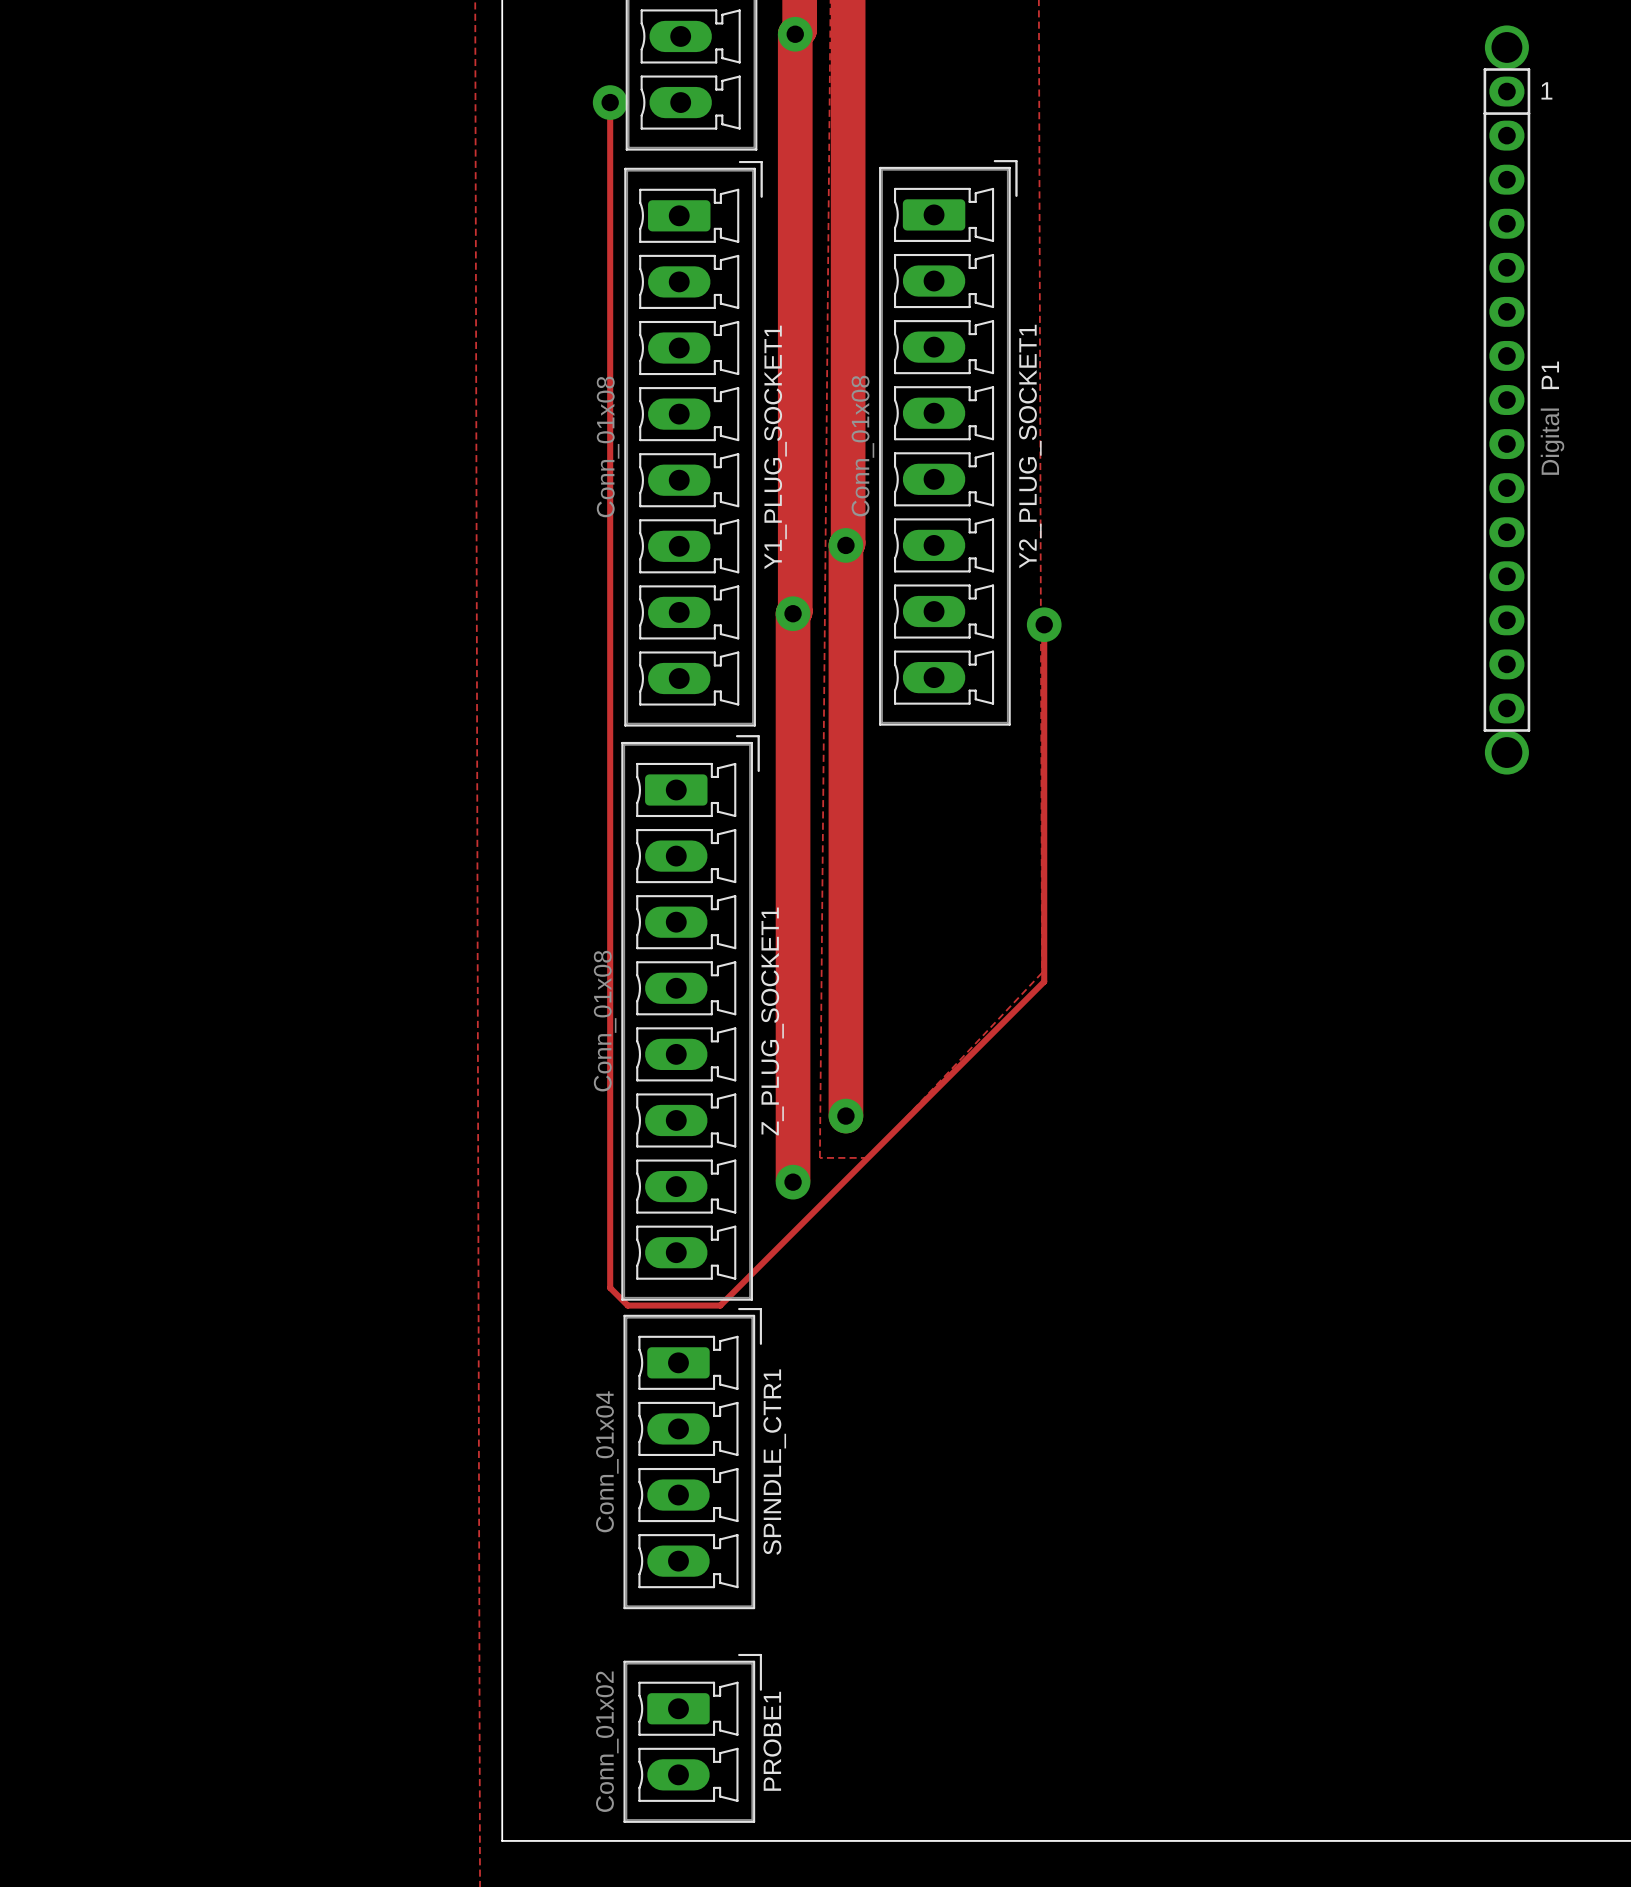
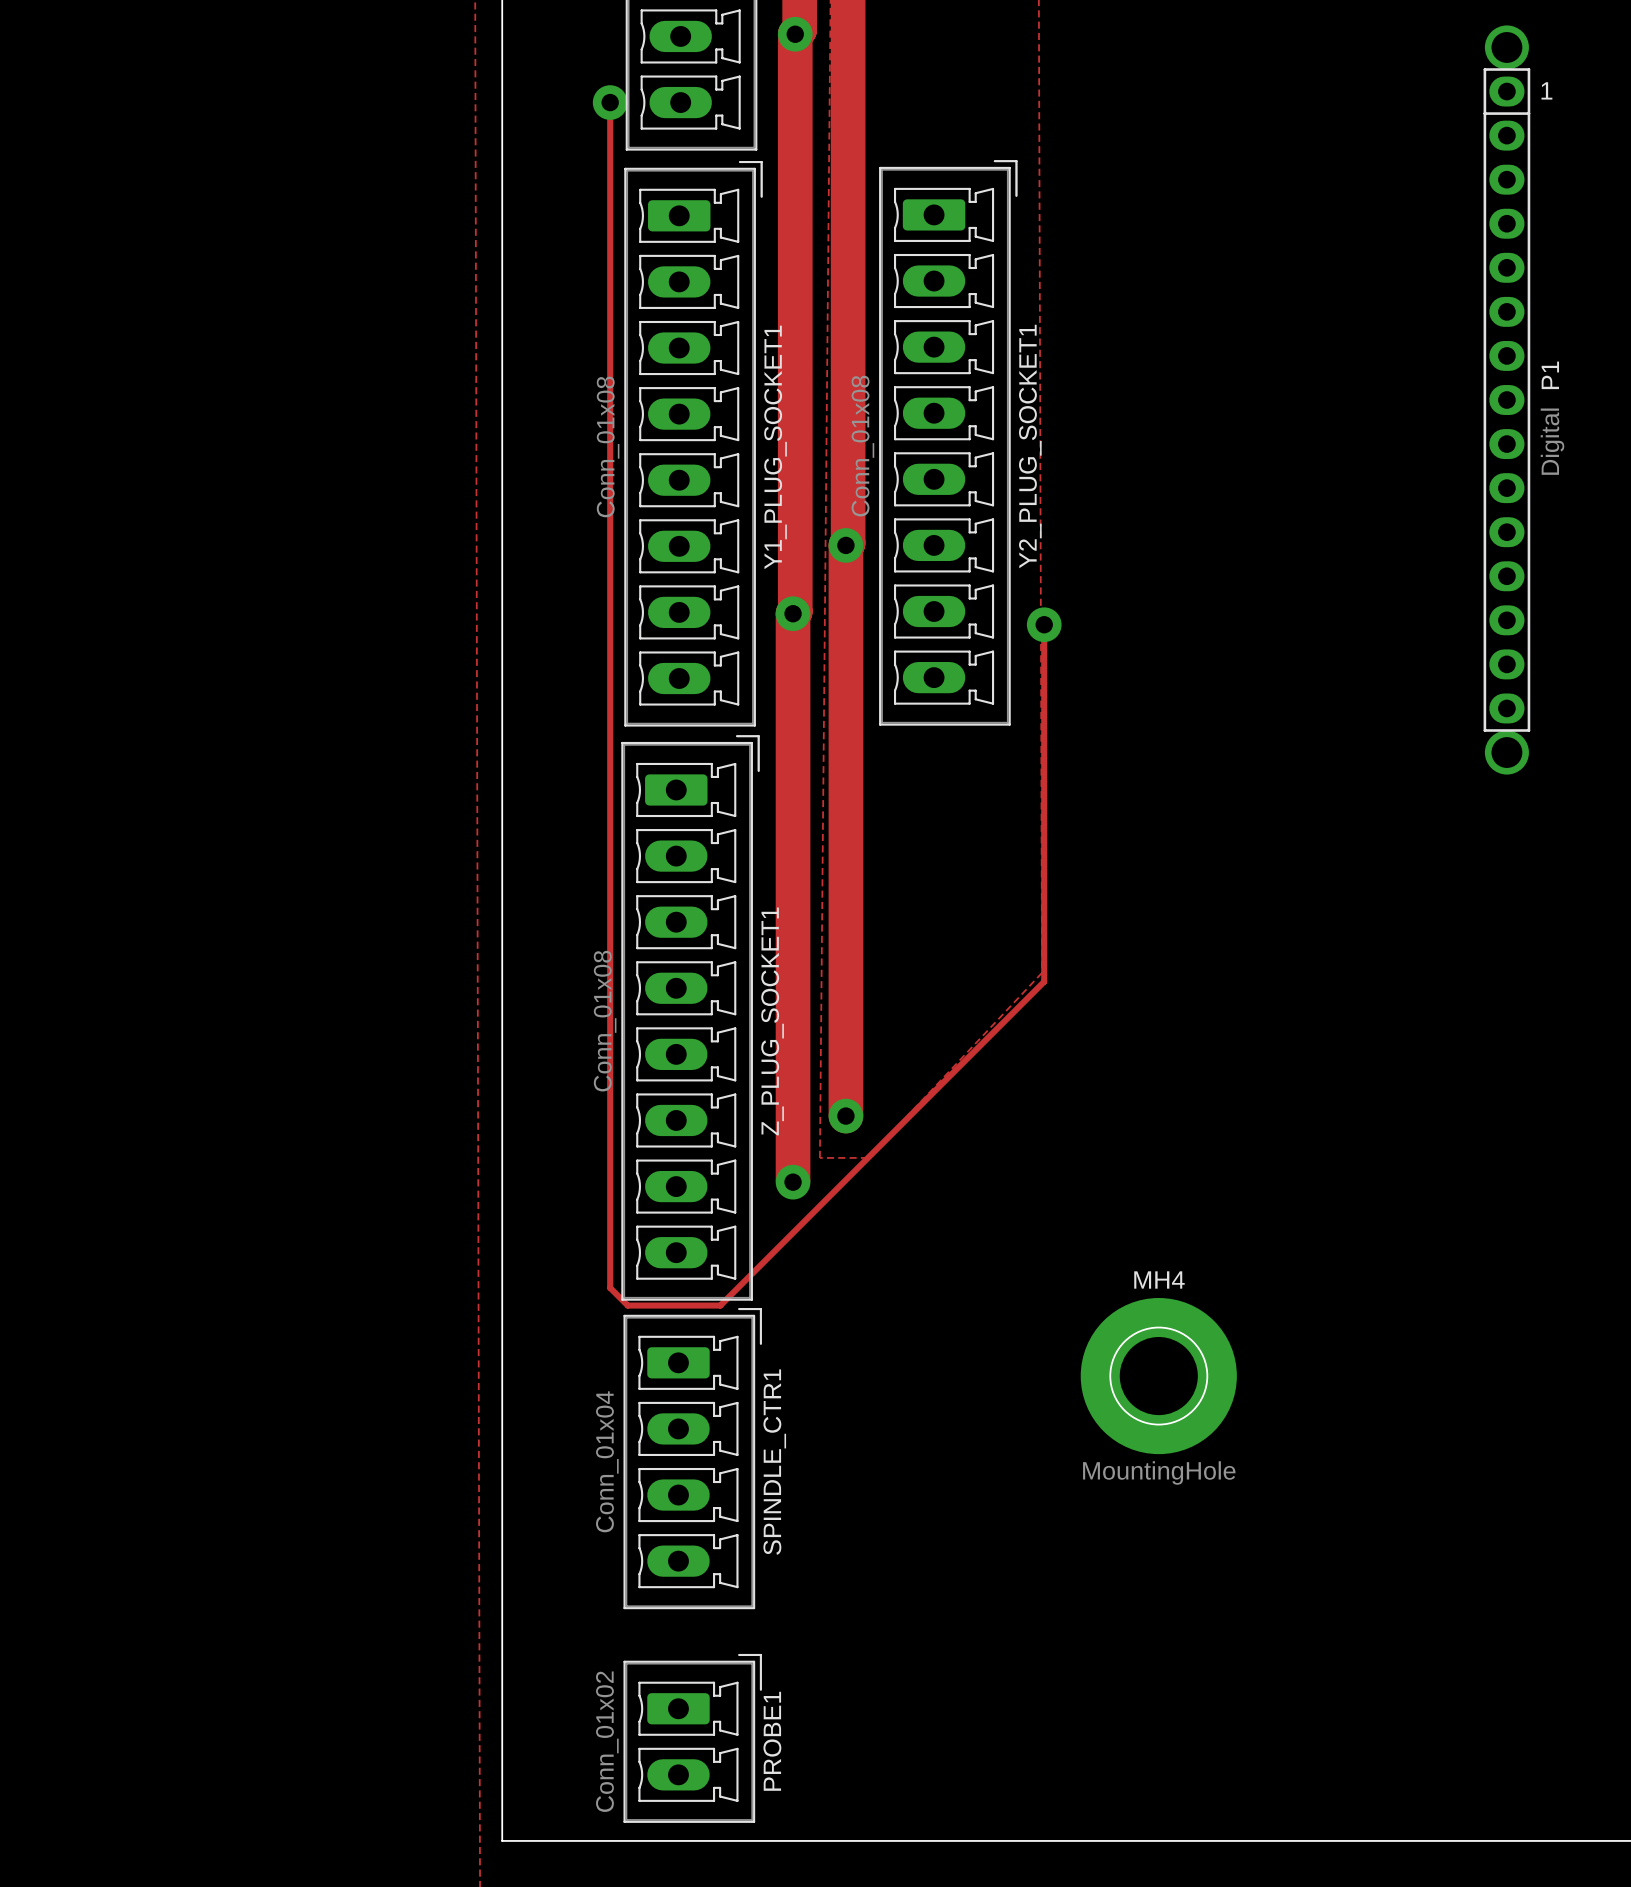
round board edge: none -> [1109, 1326, 1209, 1426]
MH4: none -> MountingHole (1158, 1376)

